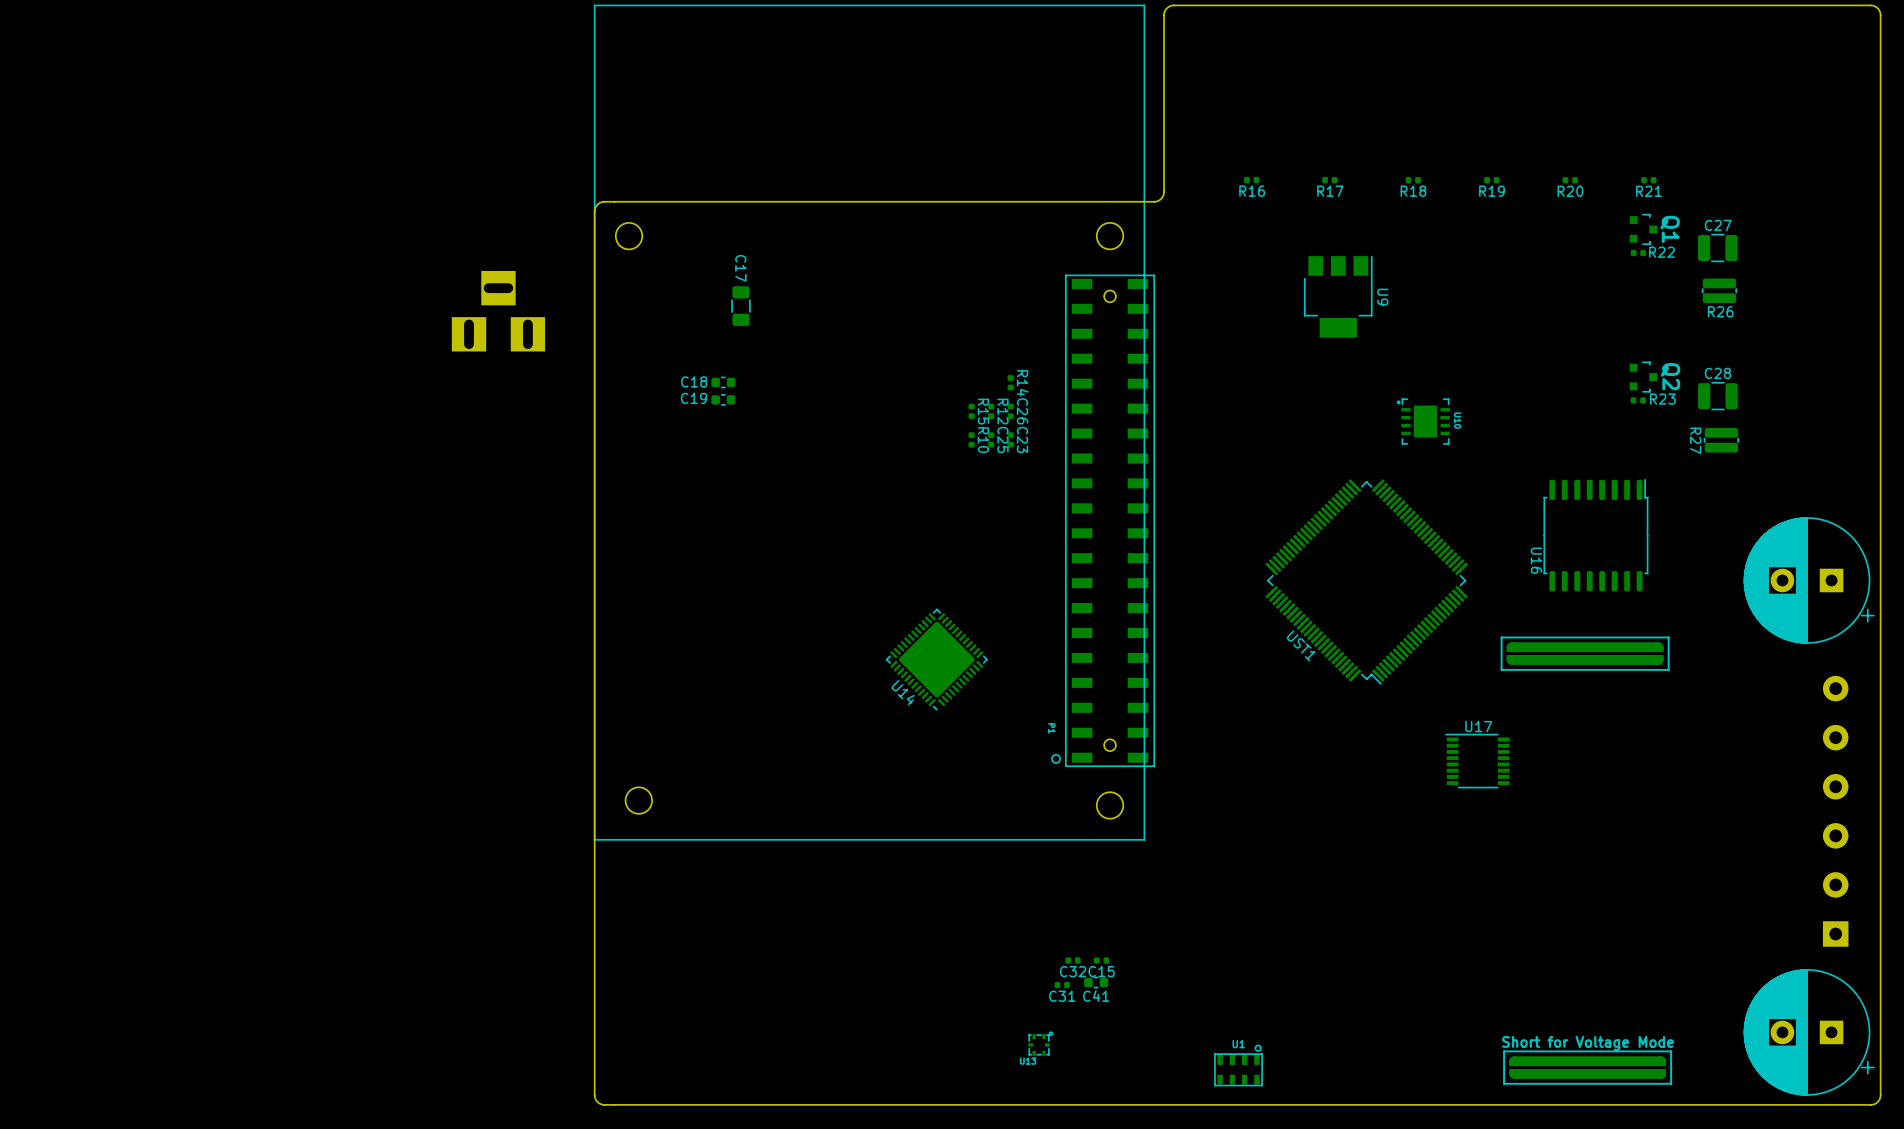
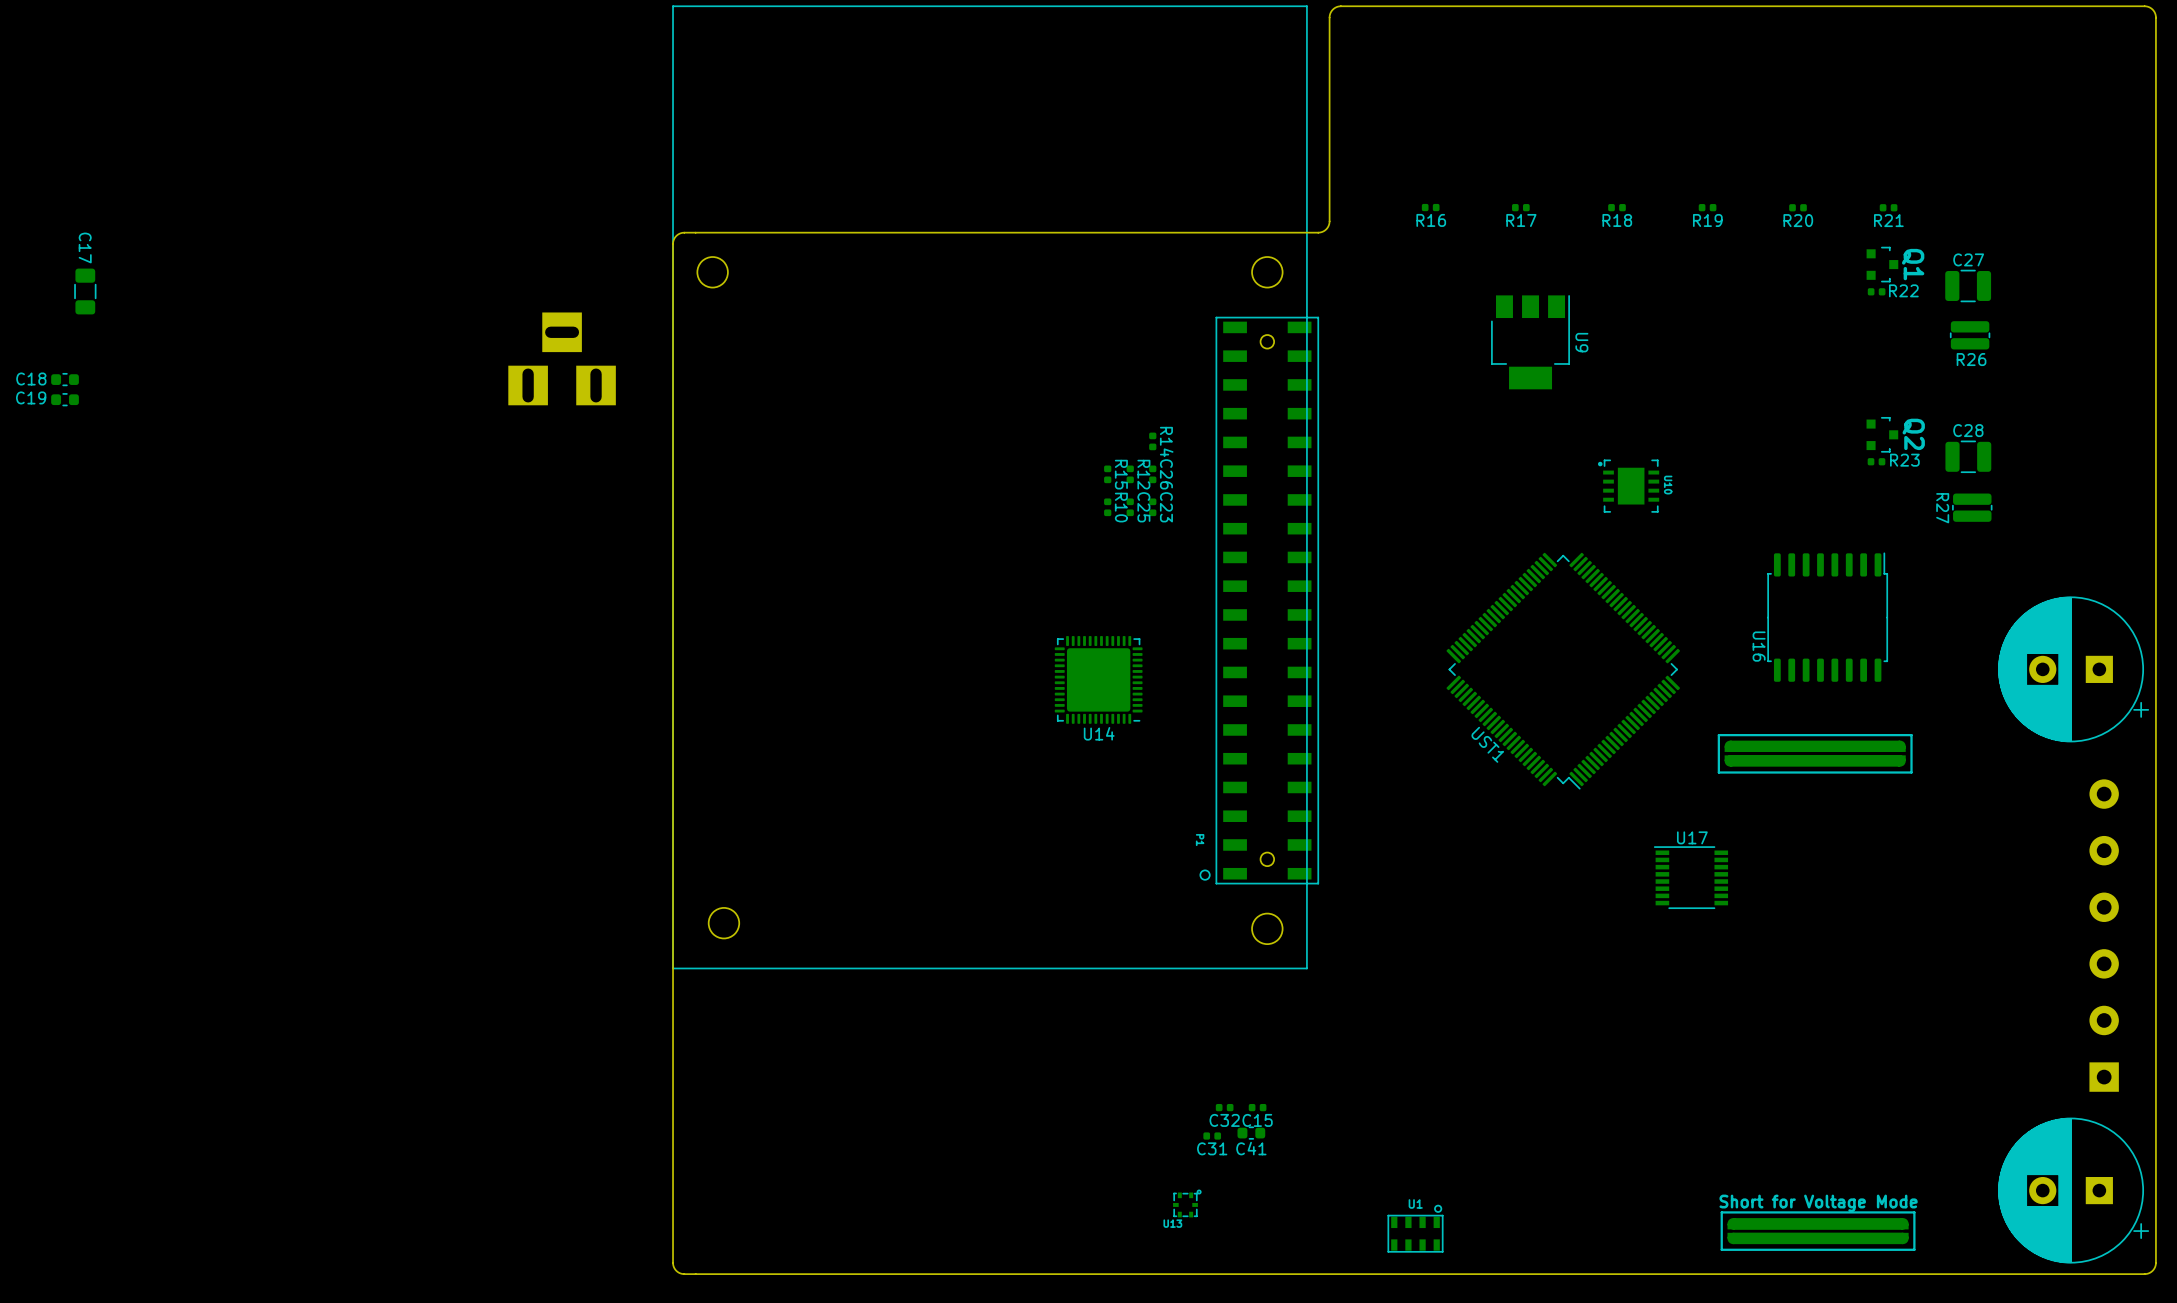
C17 position: (740, 306) -> (85, 291)
C18 position: (723, 382) -> (65, 379)
C19 position: (723, 399) -> (65, 399)
U14 rotation: 0° (936, 659) -> 45° counterclockwise (1098, 679)
U14 position: (936, 659) -> (1098, 679)

